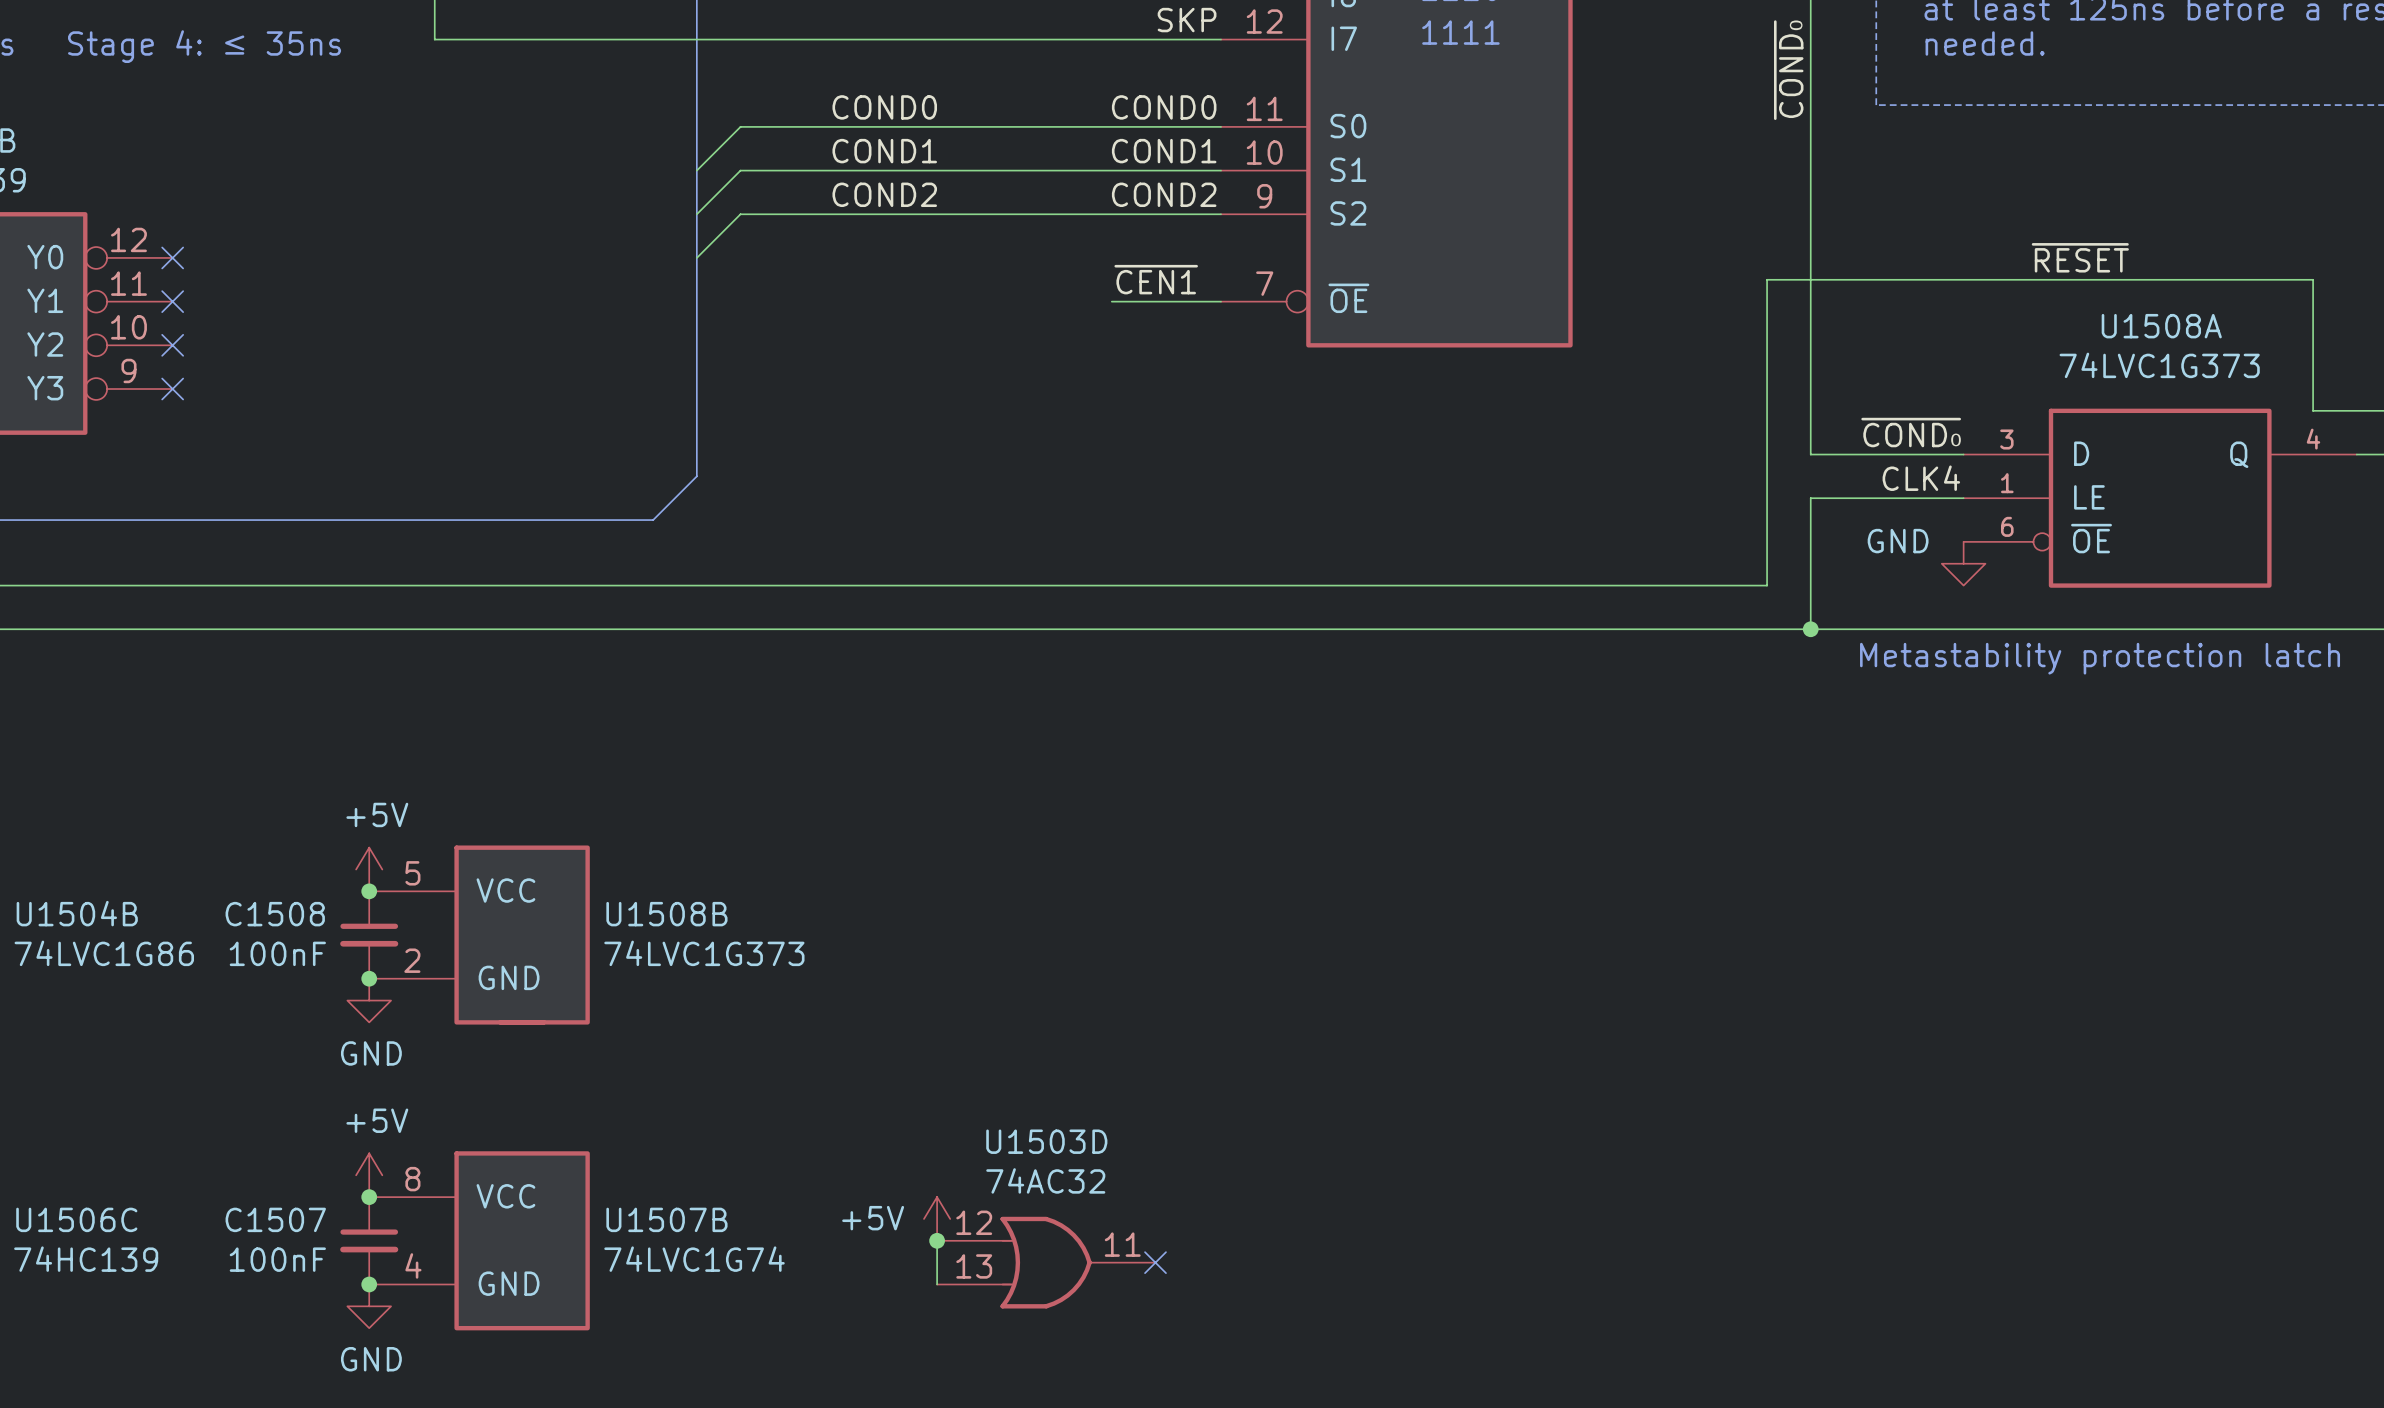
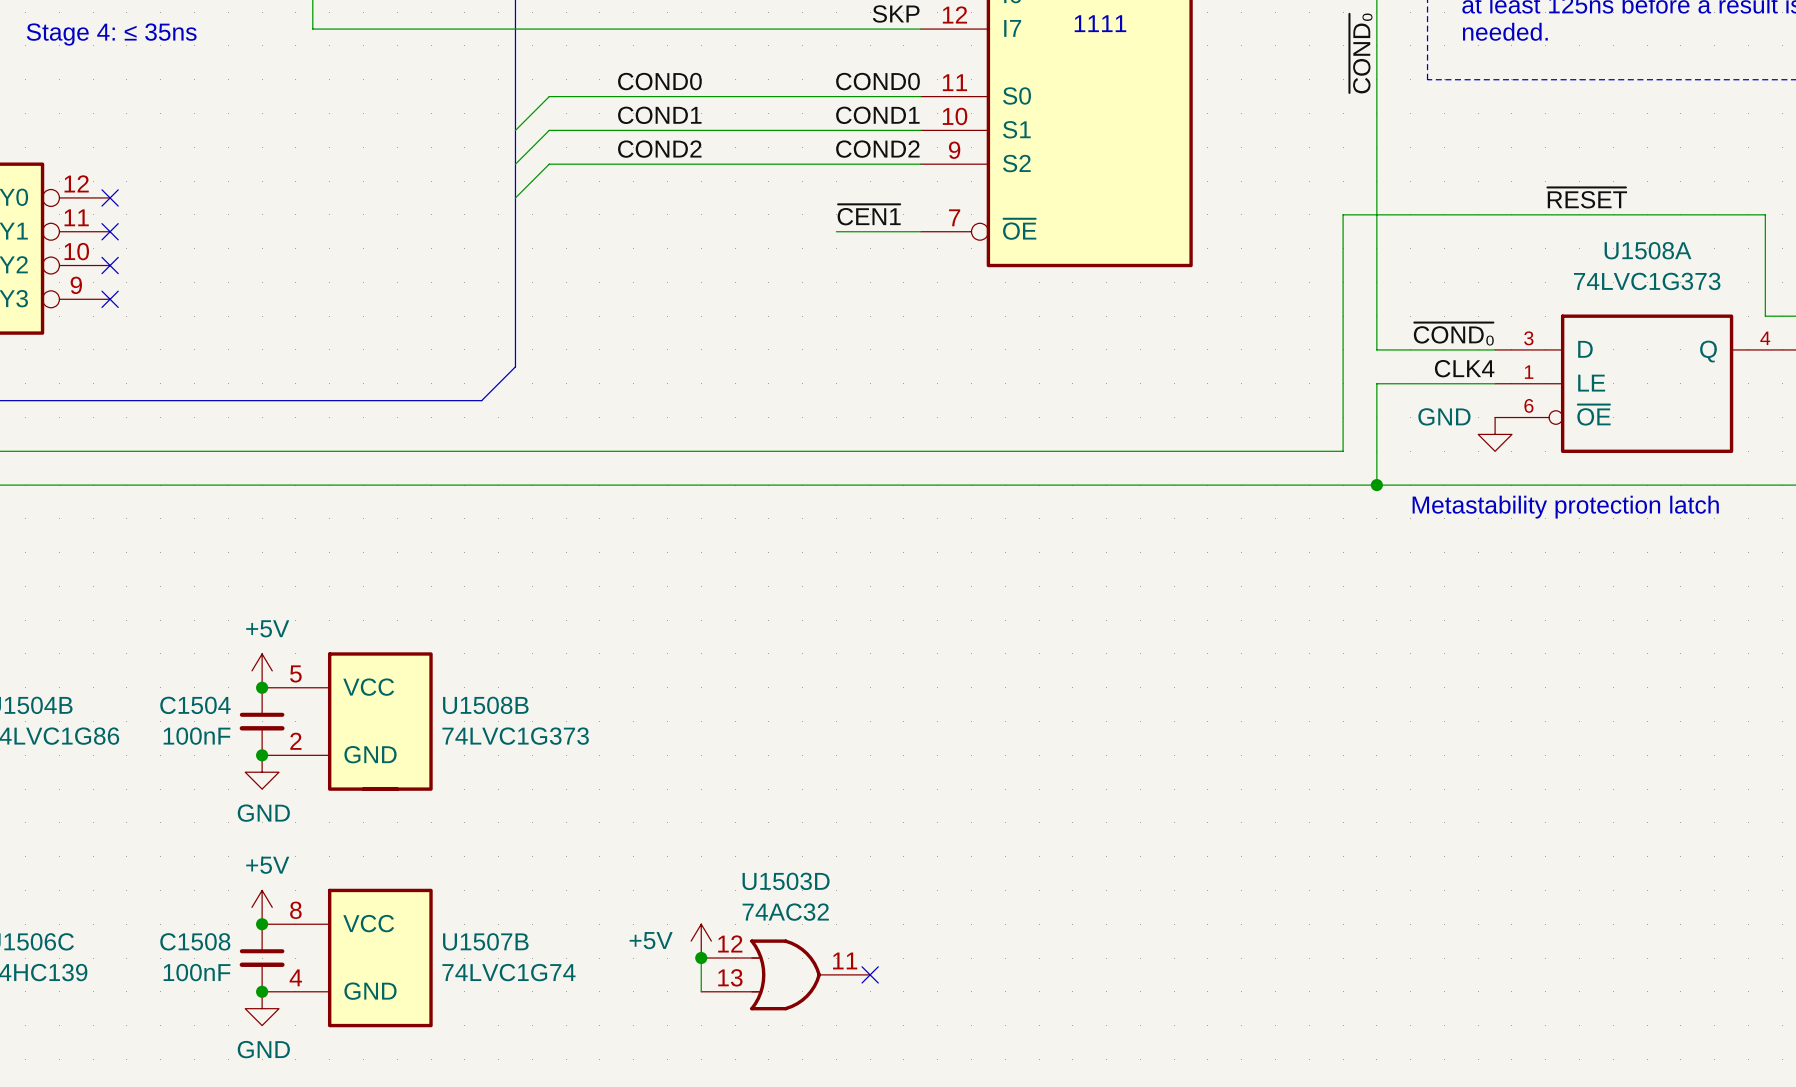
C1508 name: C1508 (275, 914) -> C1504 (195, 705)
C1507 name: C1507 (275, 1219) -> C1508 (195, 941)

